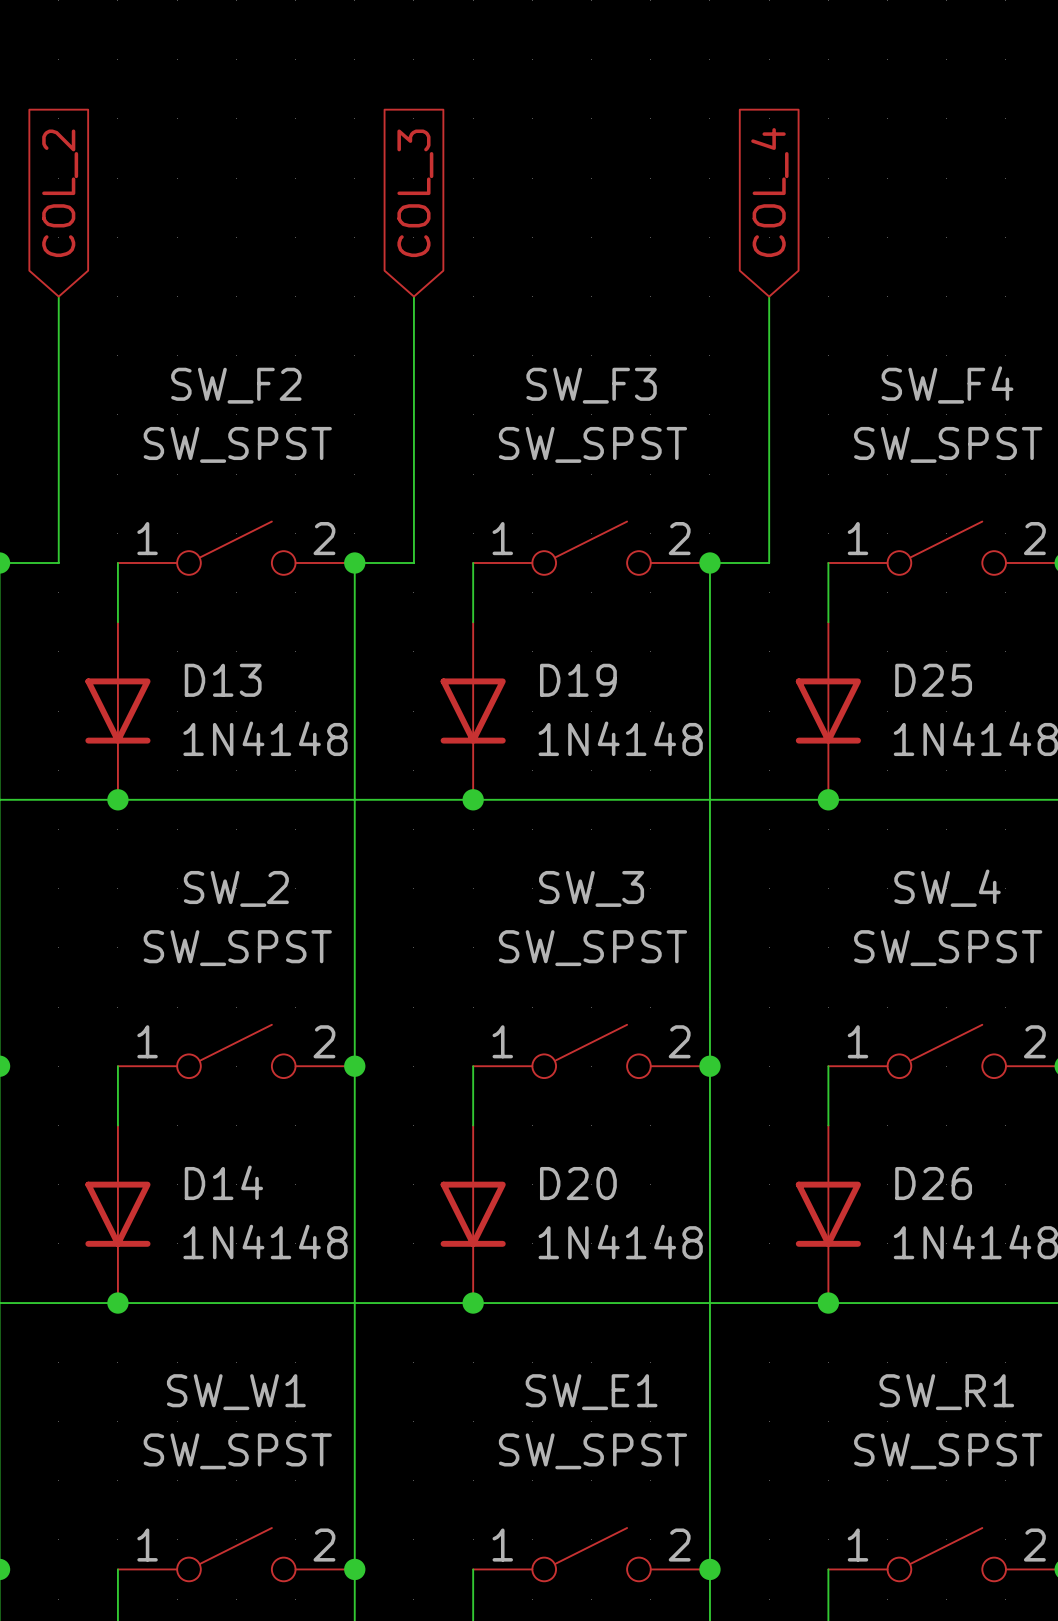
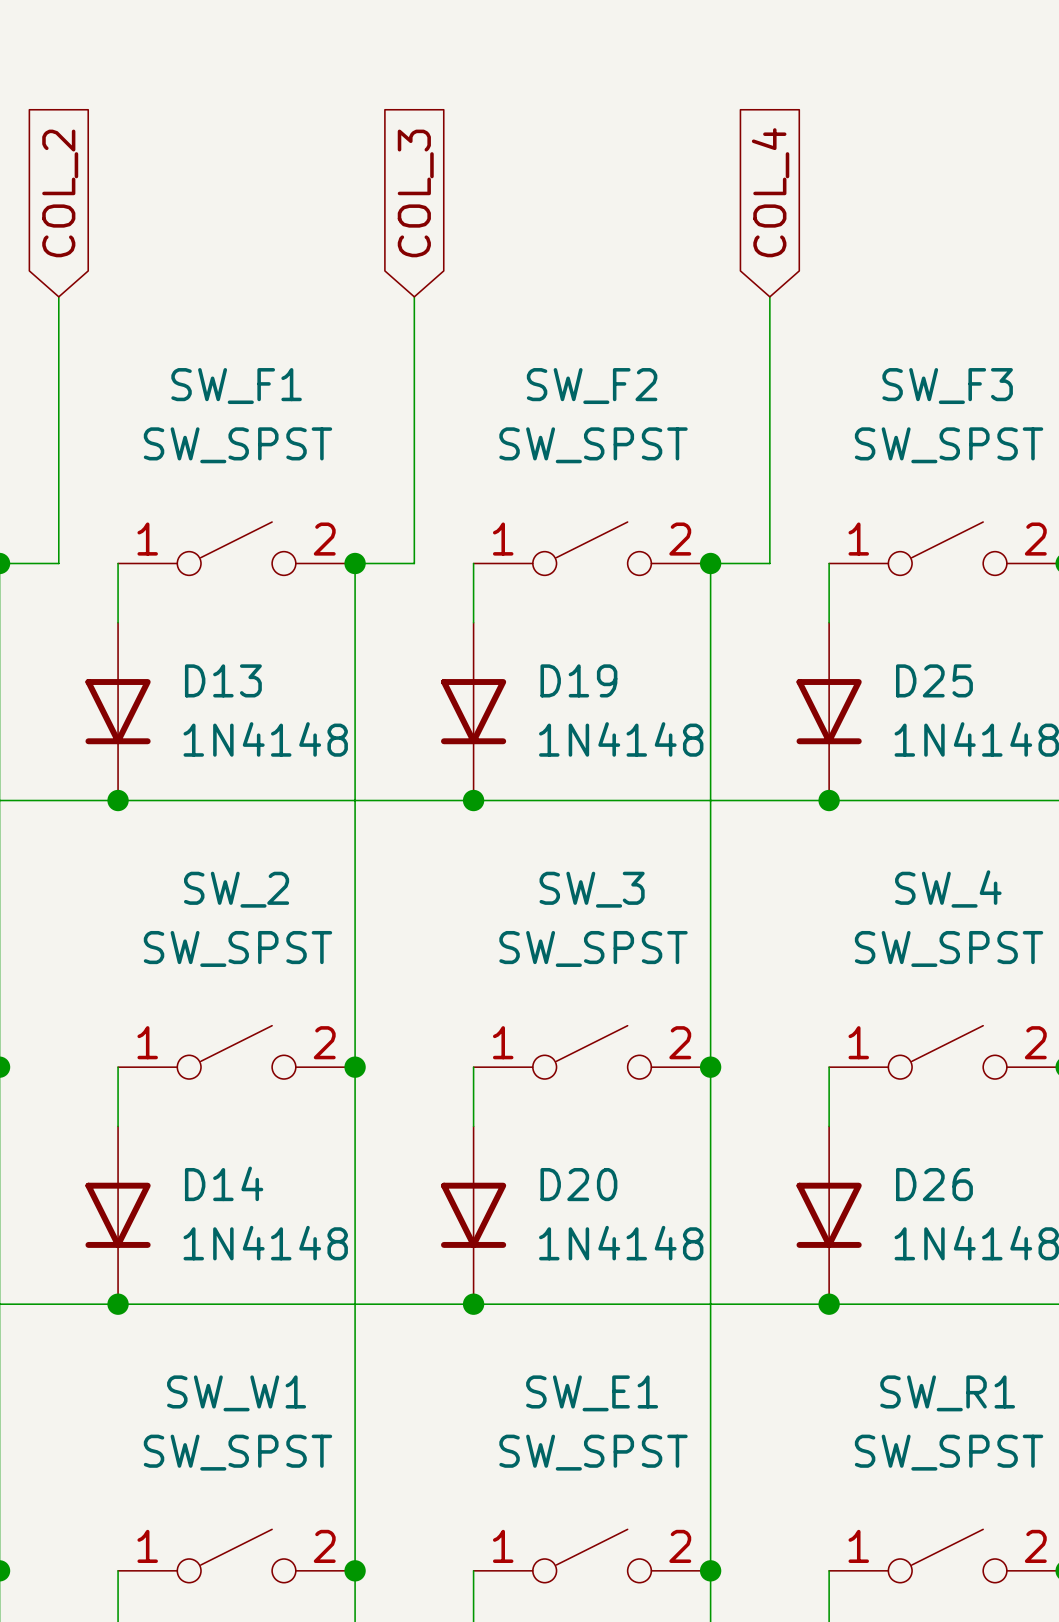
SW_F4 name: SW_F4 (947, 384) -> SW_F3 (947, 386)
SW_F2 name: SW_F2 (236, 385) -> SW_F1 (236, 386)
SW_F3 name: SW_F3 (591, 385) -> SW_F2 (592, 386)

